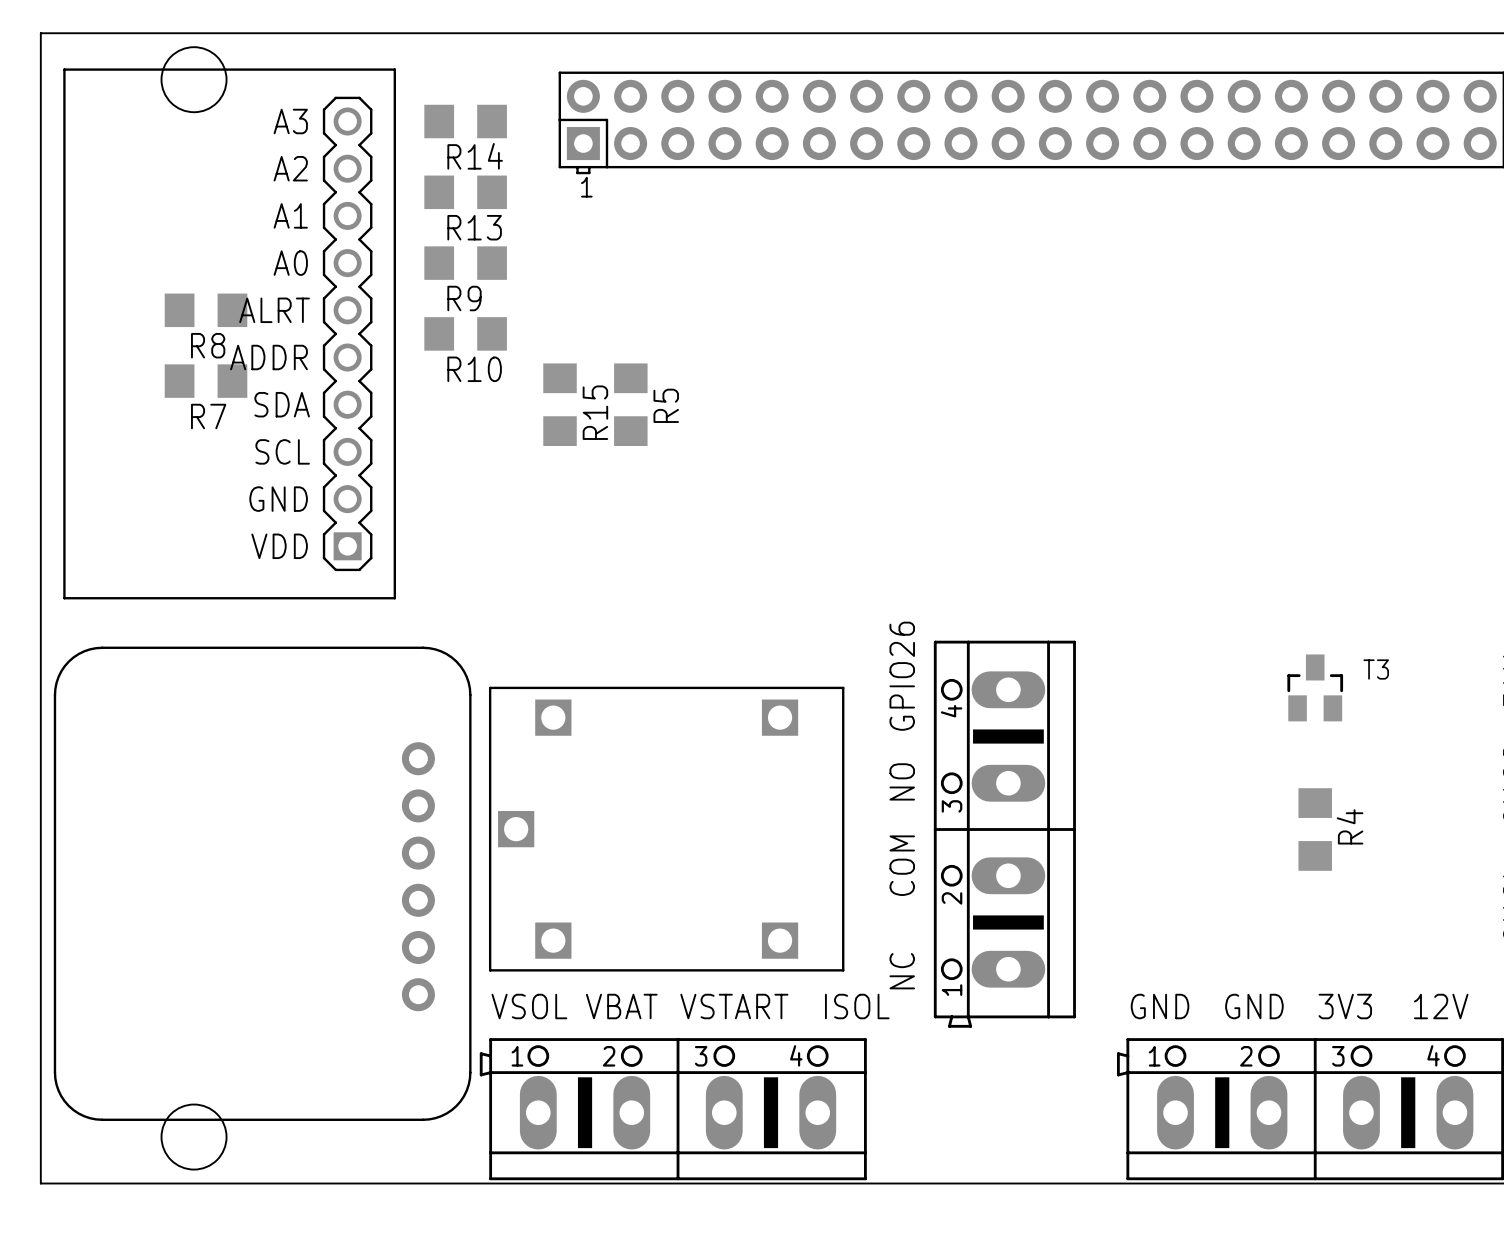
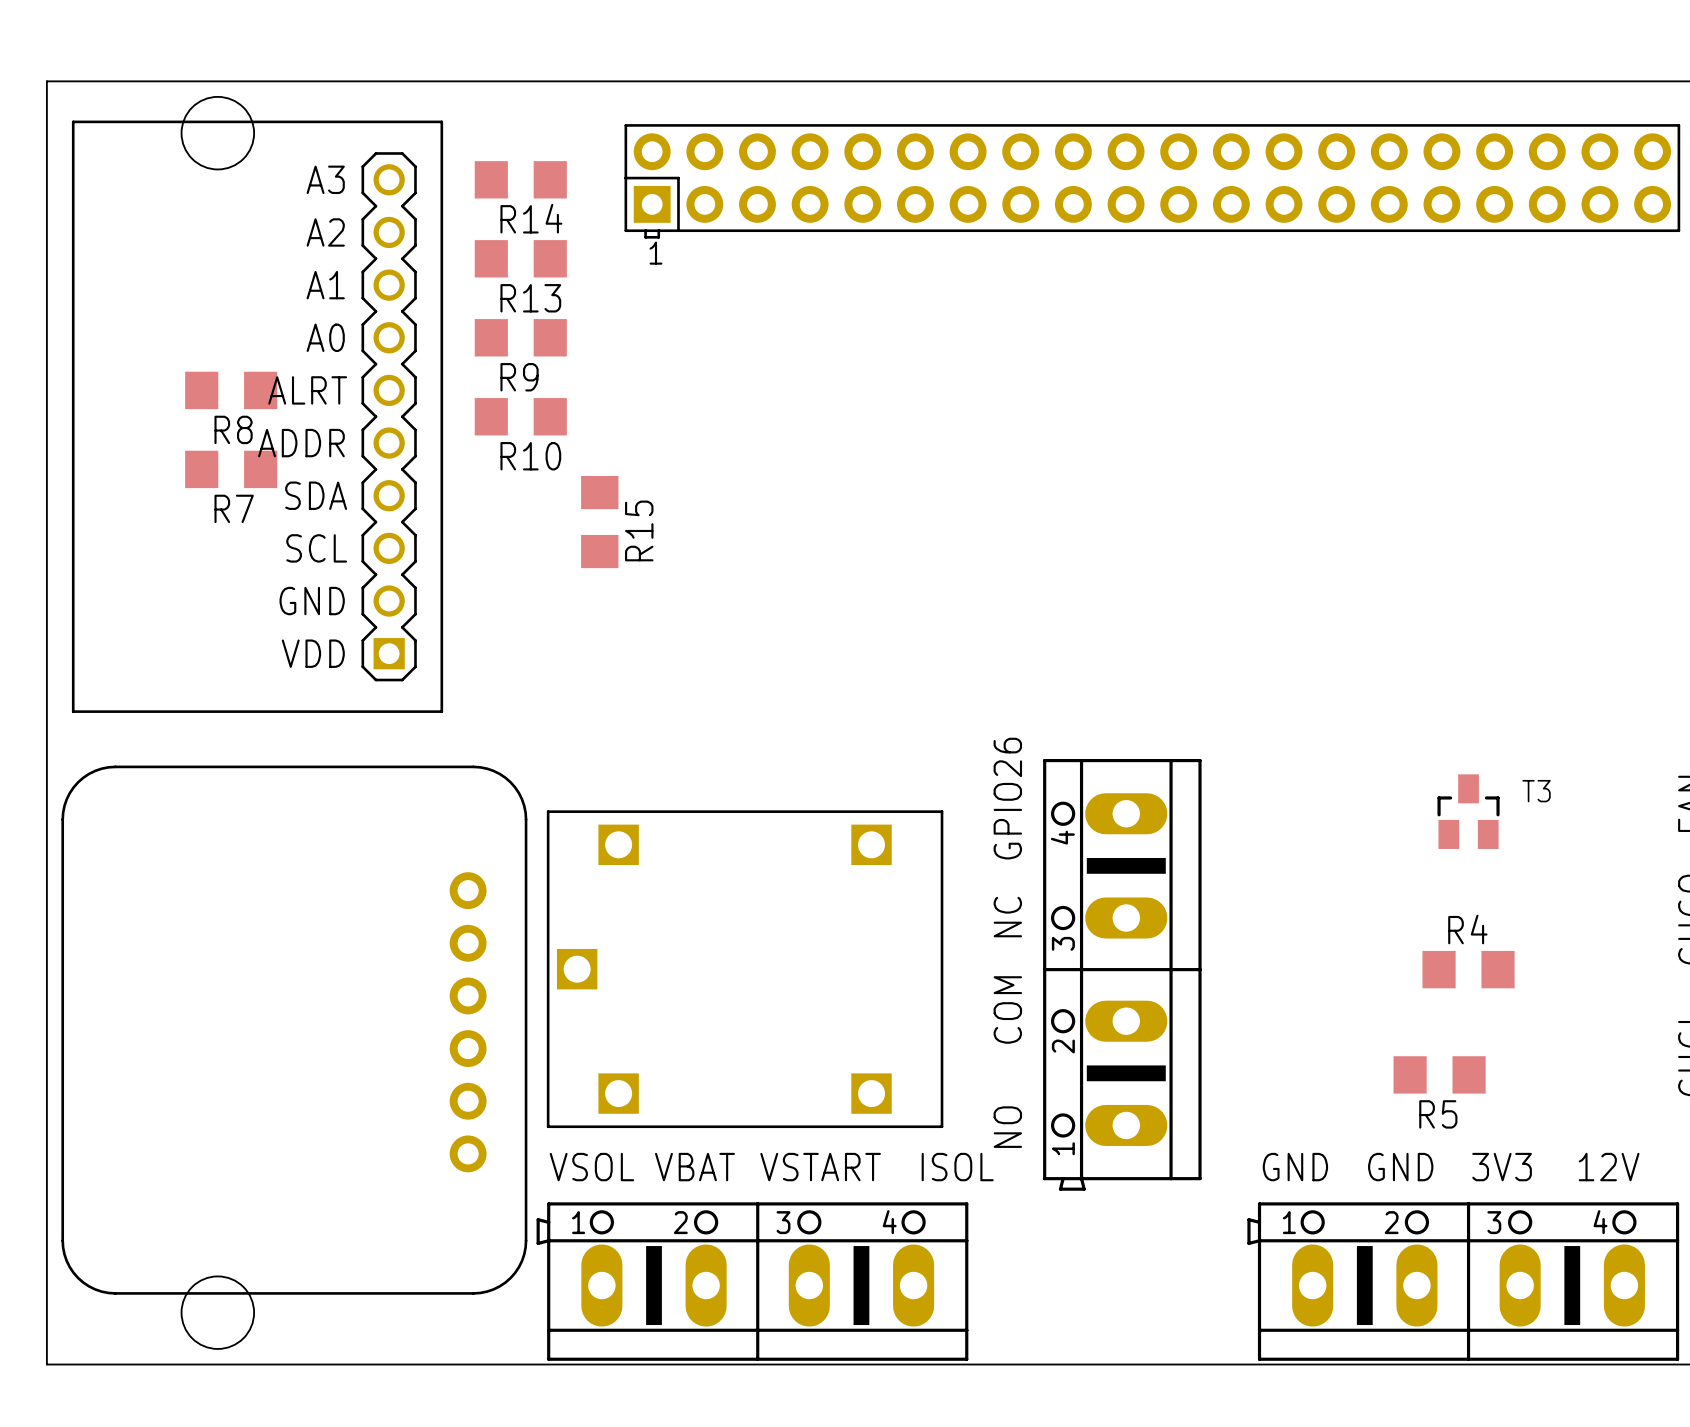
R15 position: (560, 404) -> (599, 522)
R5 rotation: 0° (630, 404) -> 90° clockwise (1439, 1074)
R5 position: (630, 404) -> (1439, 1074)
text: NO (902, 781) -> NC (1007, 917)
R4 name position: R4 (1350, 826) -> R4 (1467, 929)
R4 rotation: 0° (1315, 829) -> 90° clockwise (1468, 969)
text: NC (902, 971) -> NO (1007, 1127)

